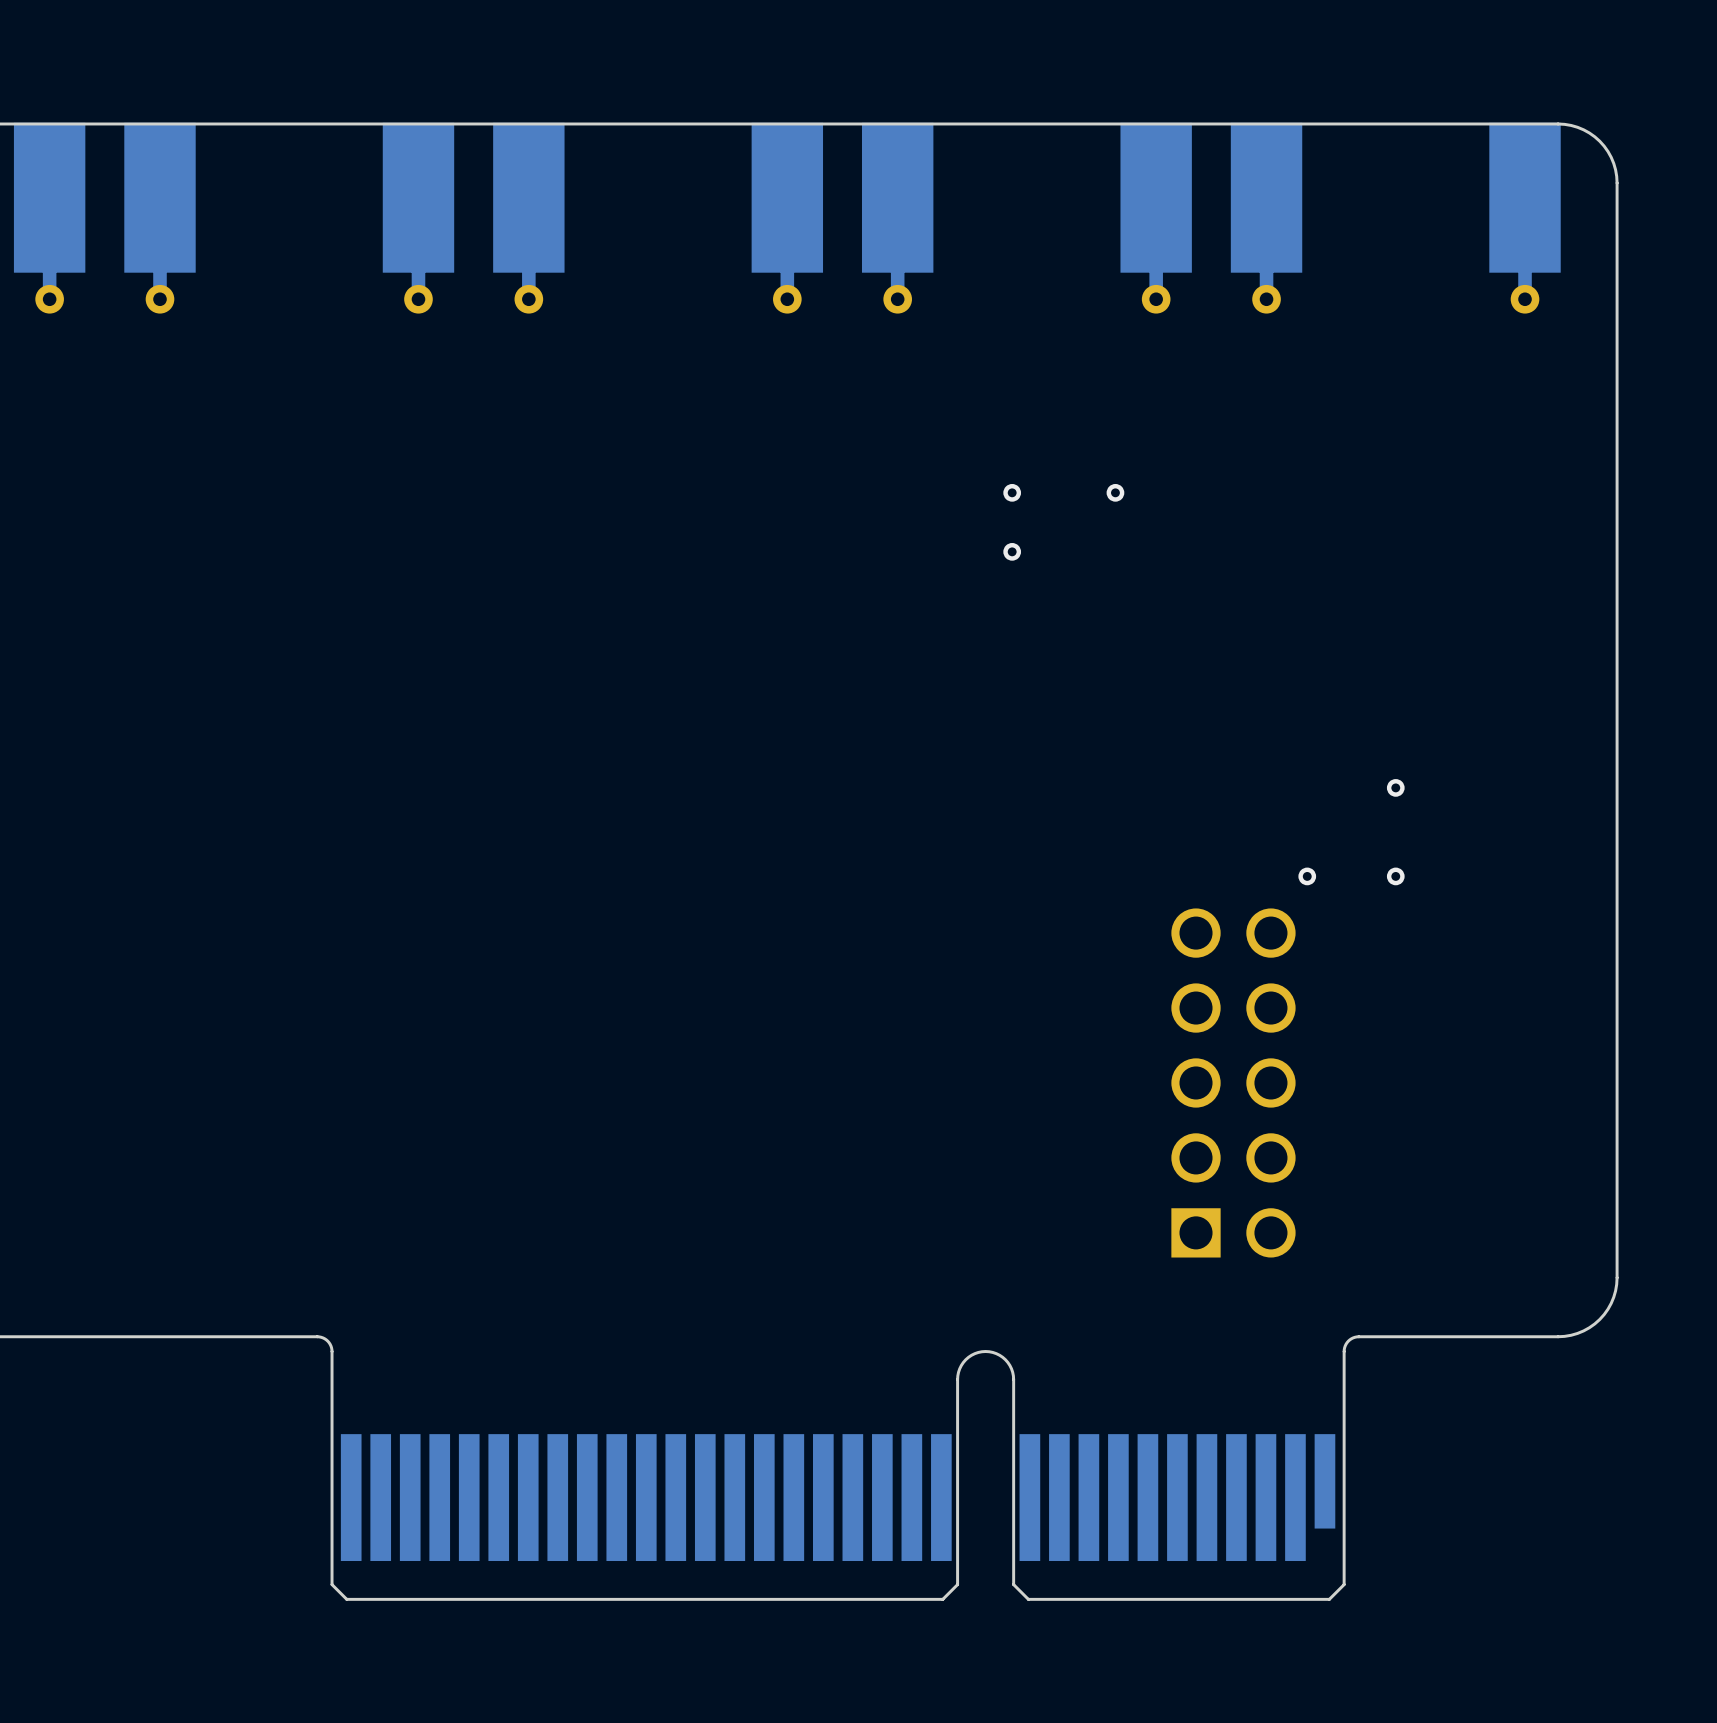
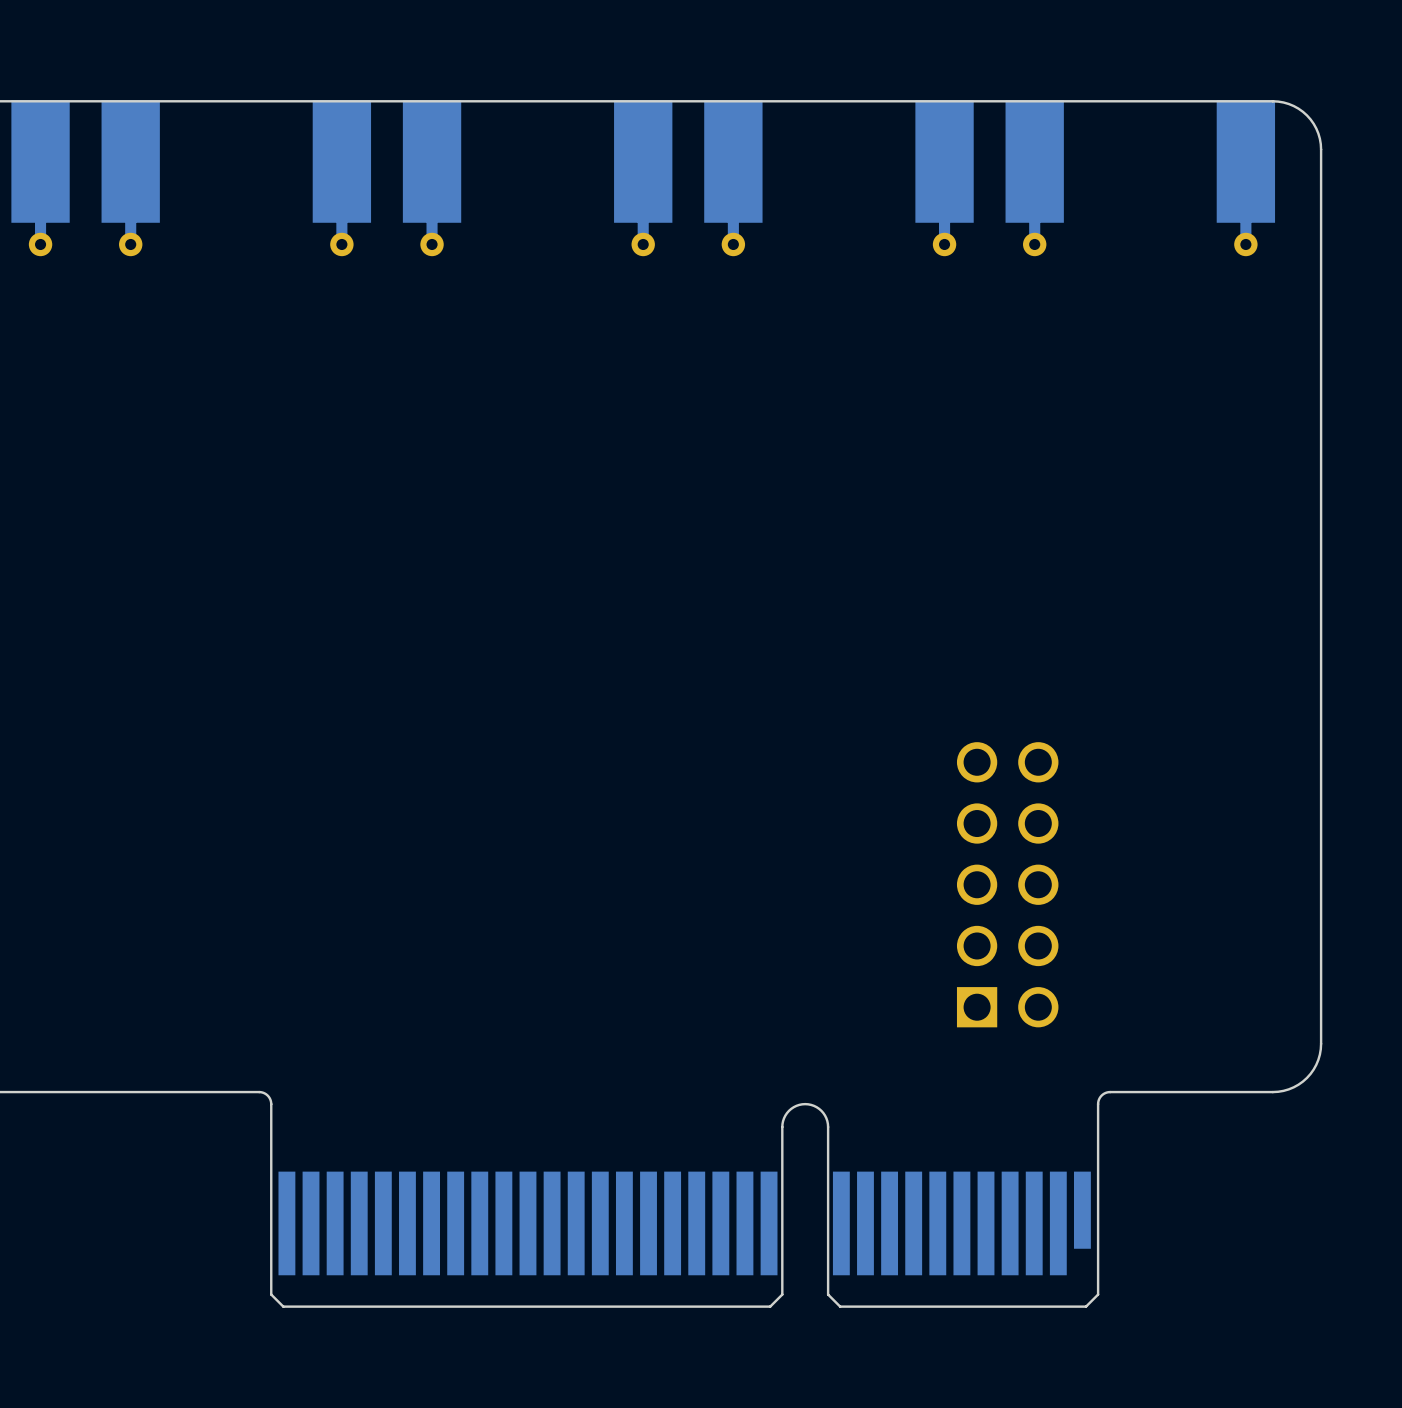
via: (1012, 492) -> none
via: (1115, 492) -> none
via: (1012, 551) -> none
via: (1395, 787) -> none
via: (1307, 876) -> none
via: (1395, 876) -> none

